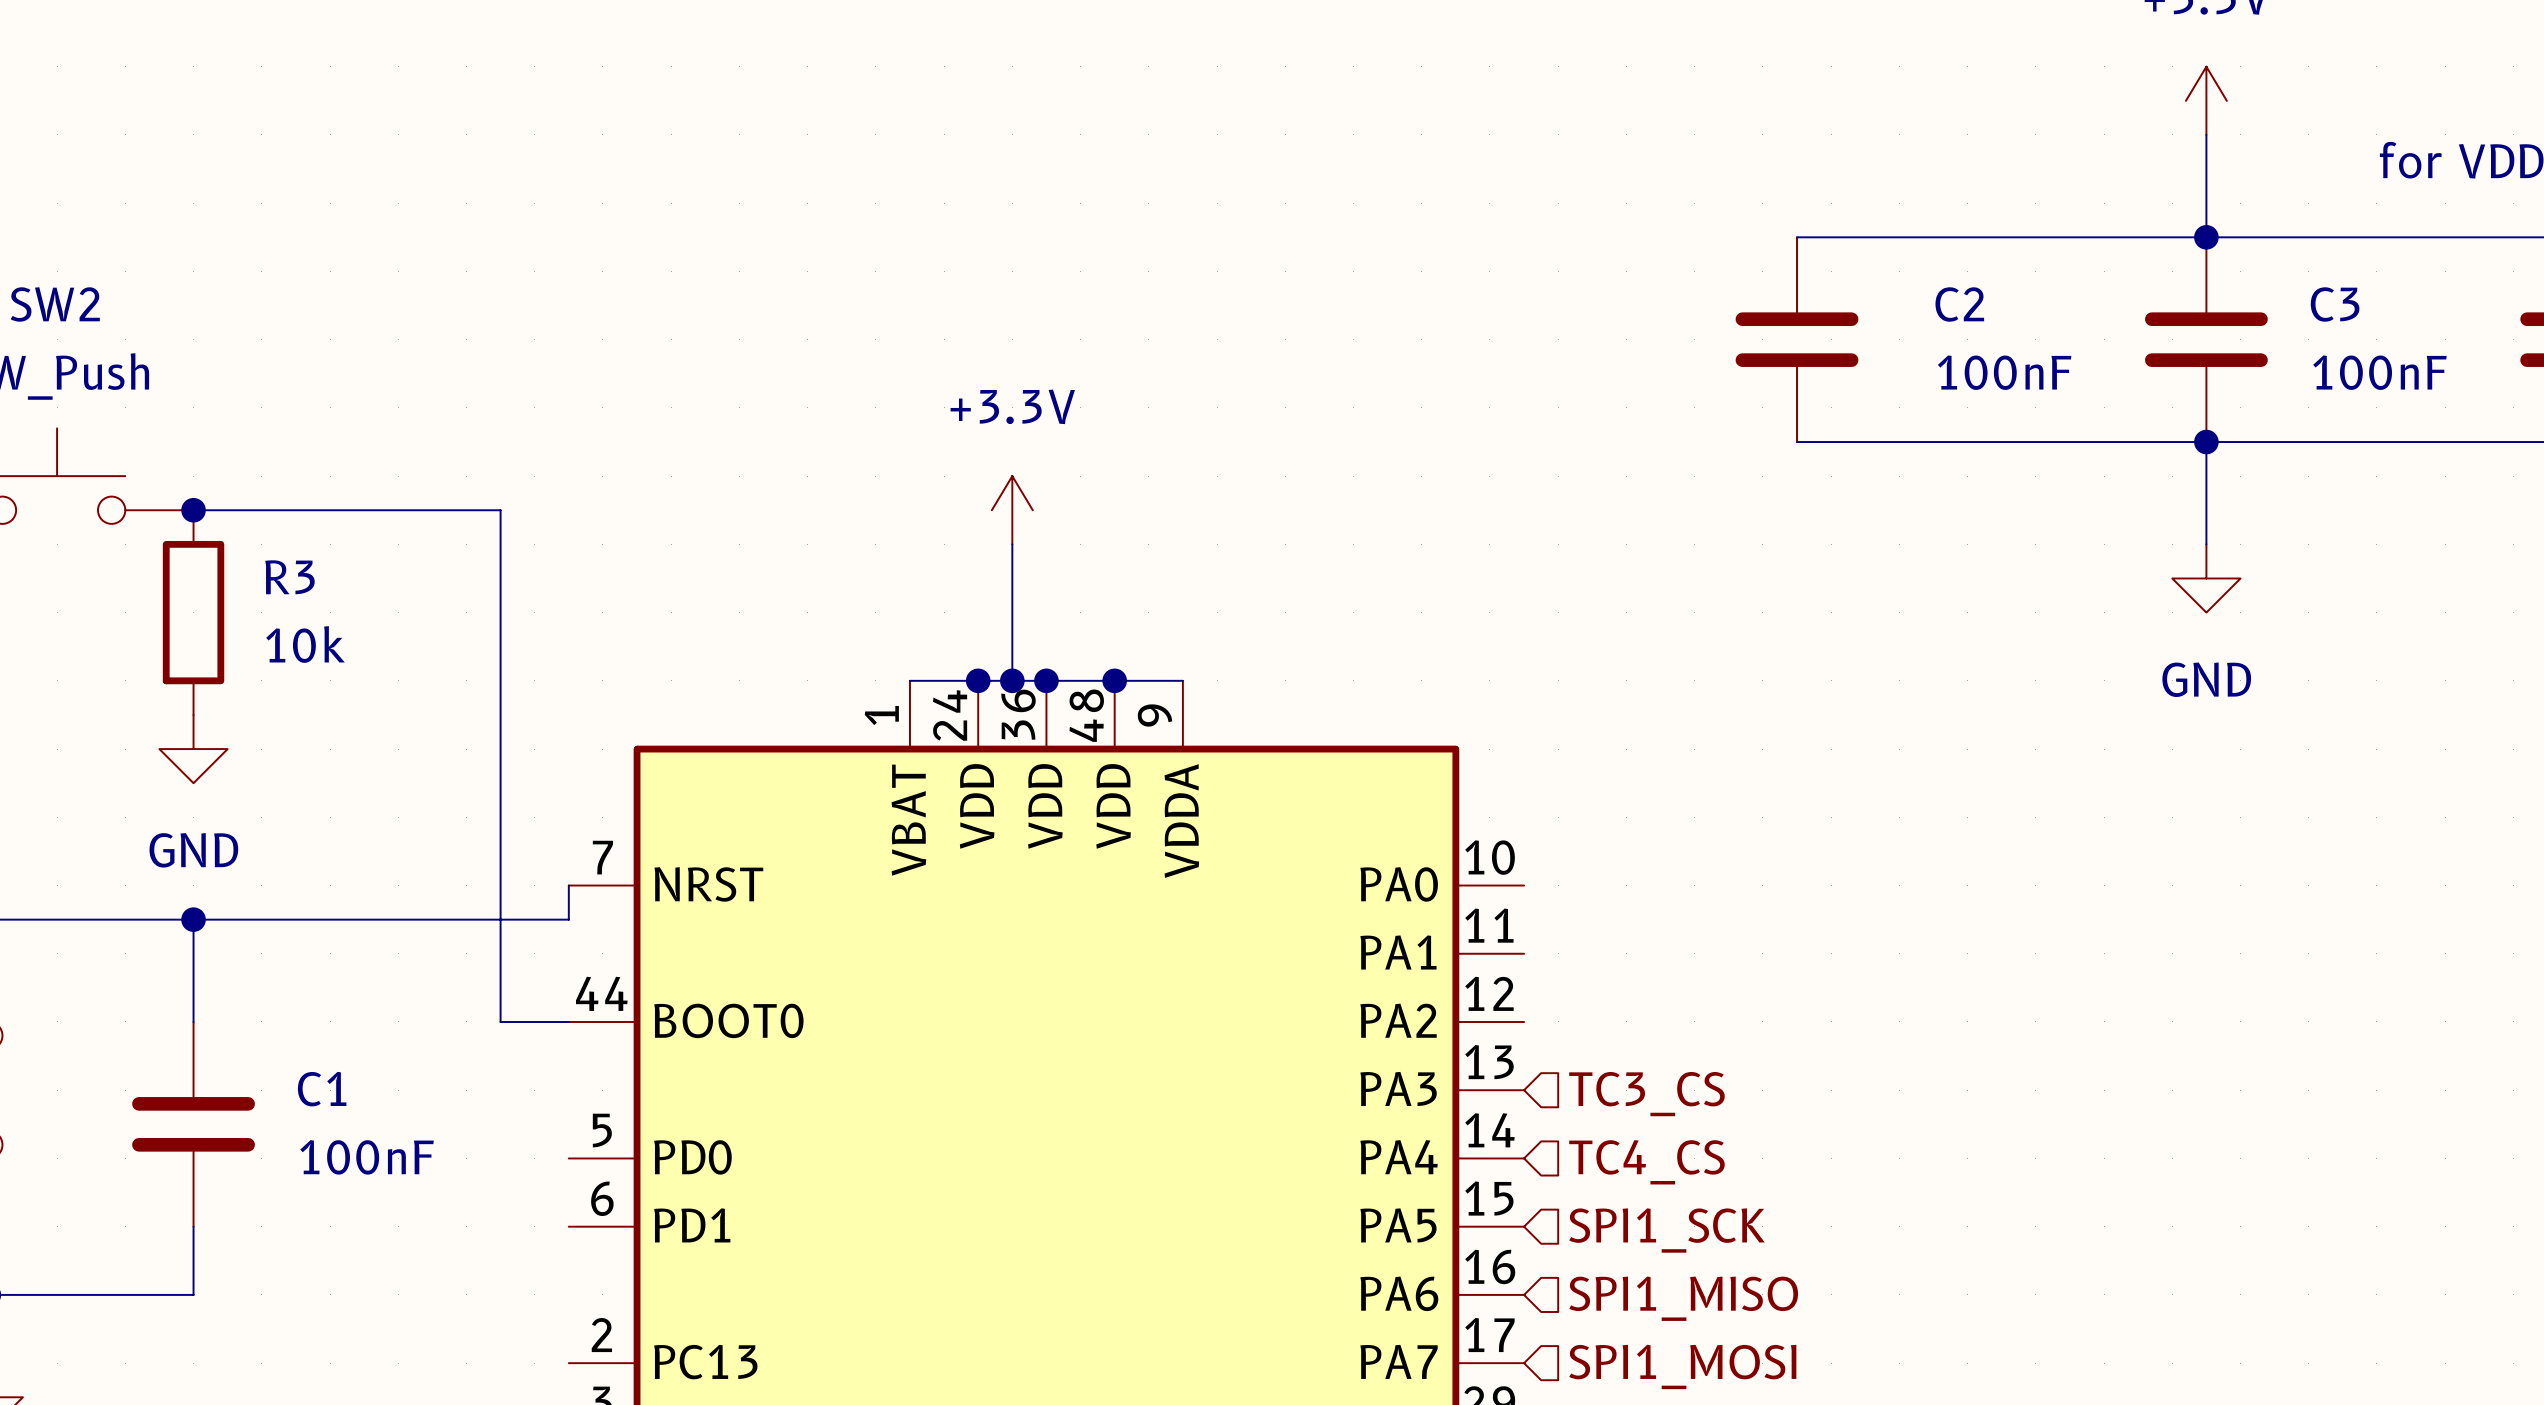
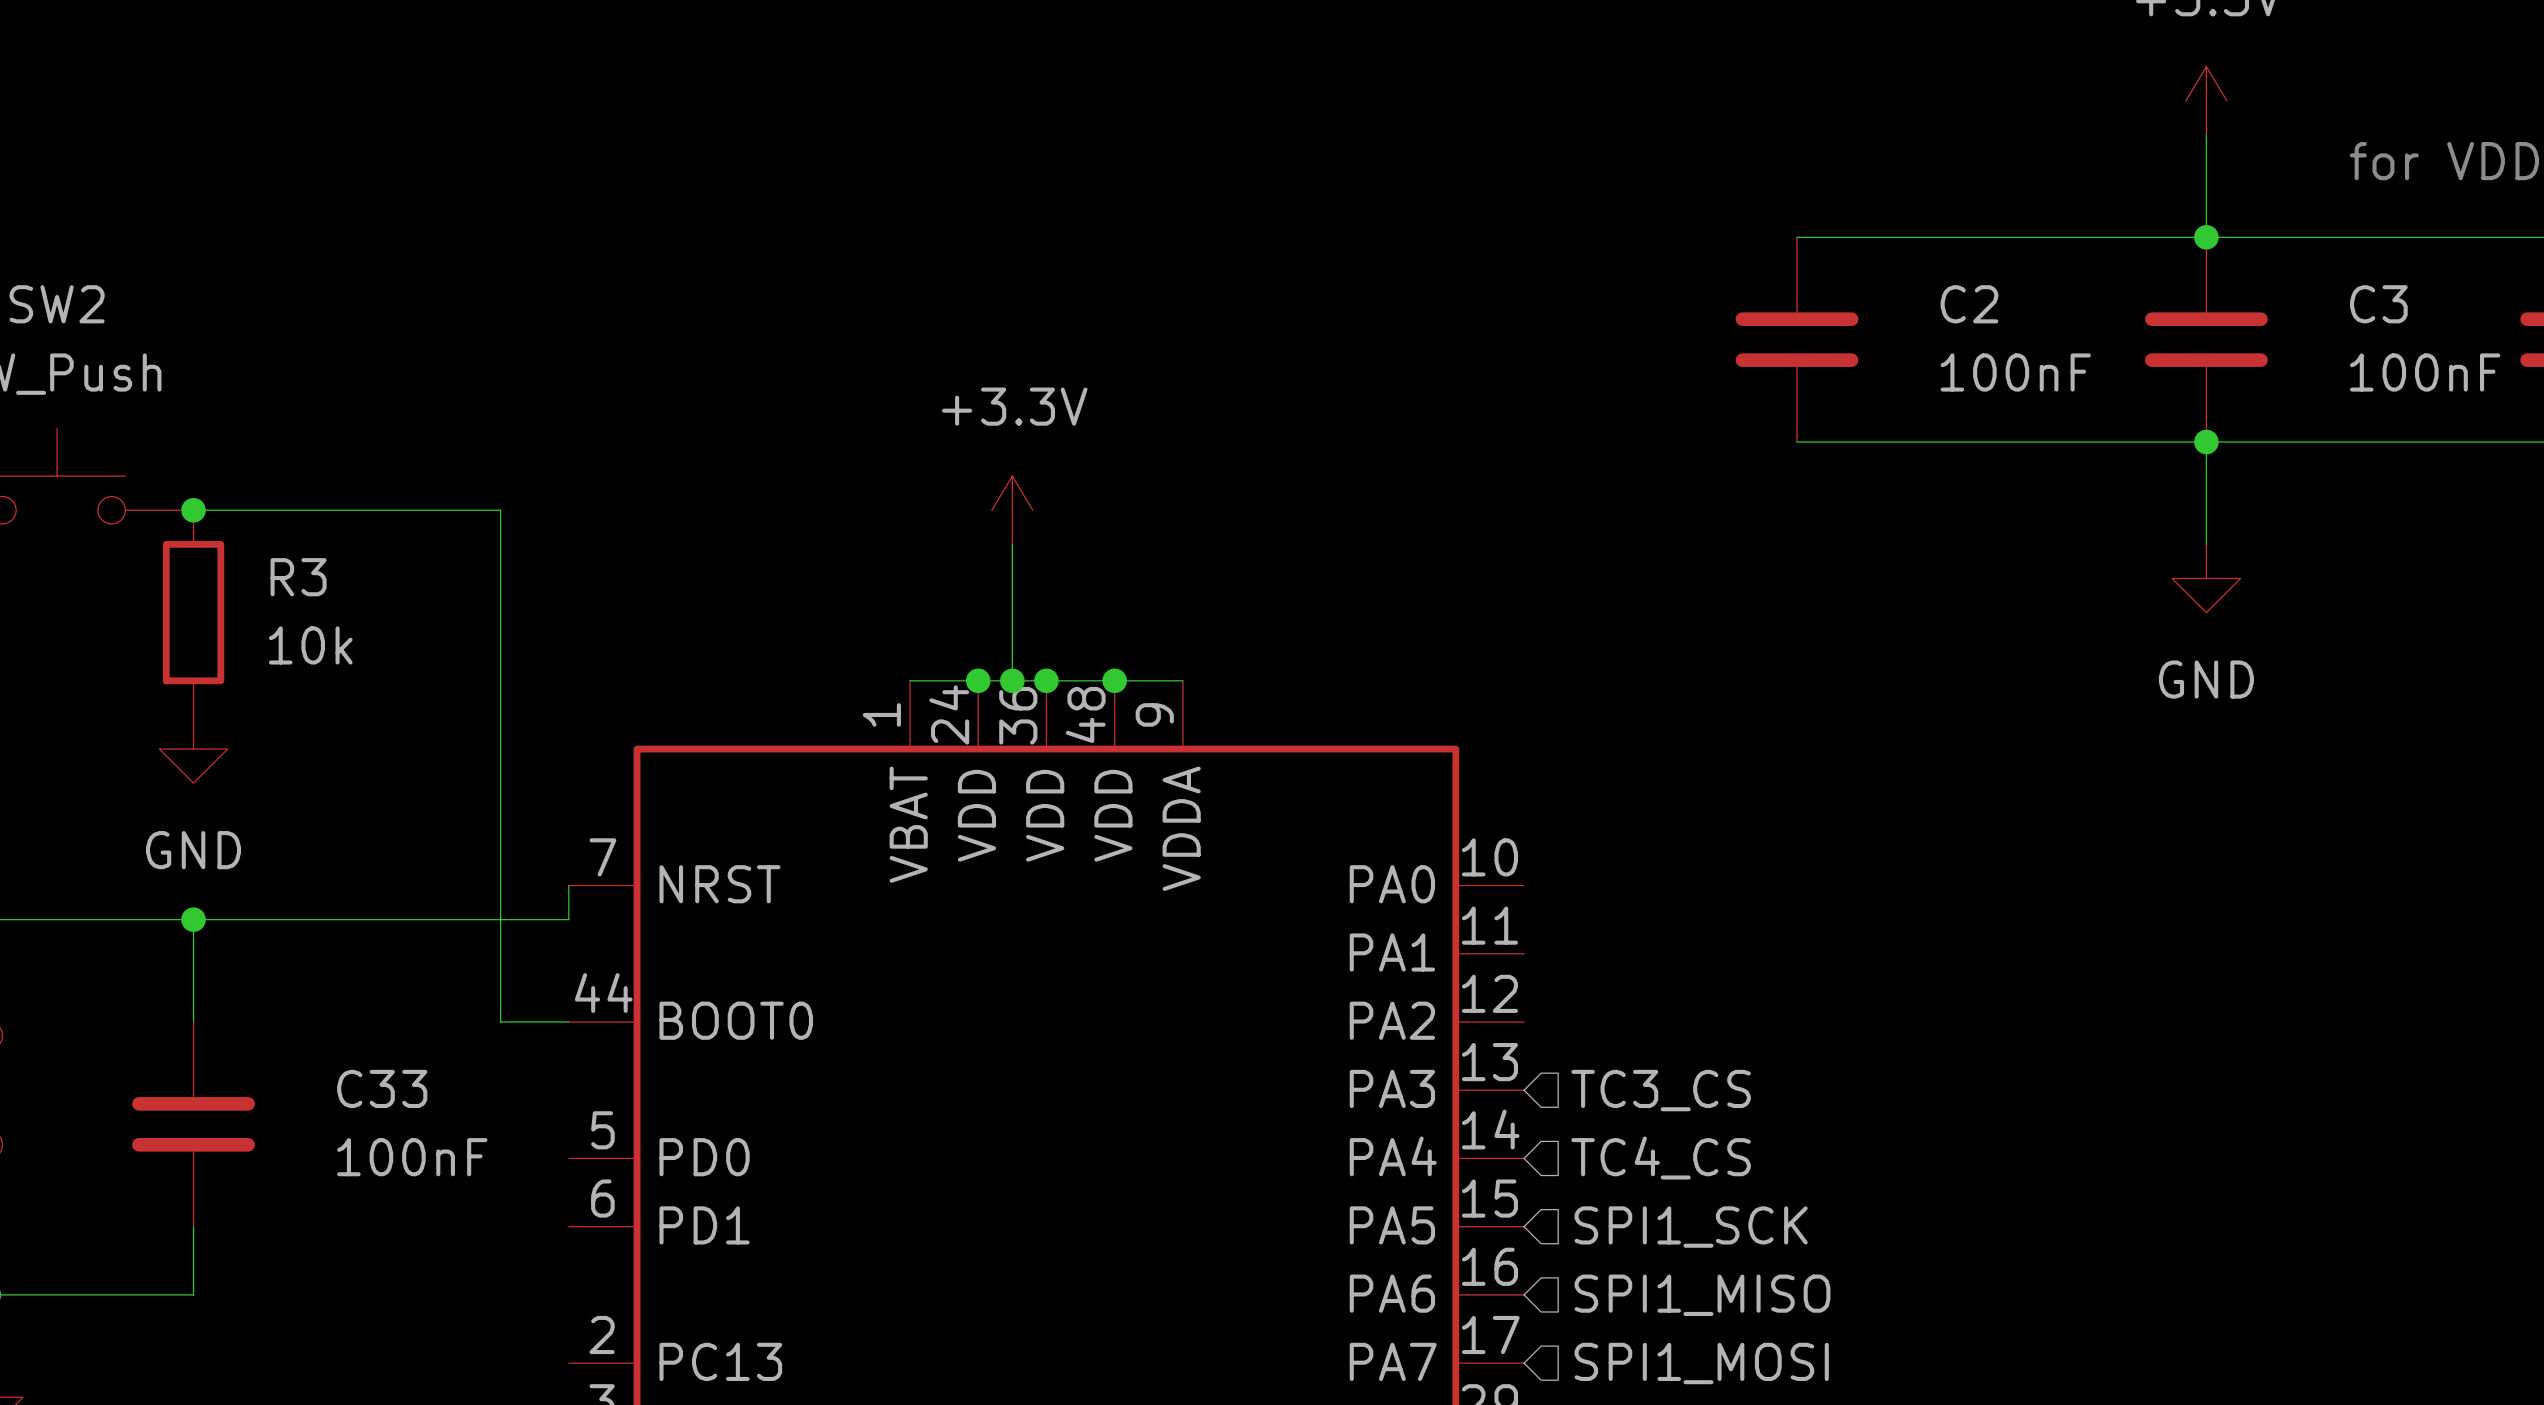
C3 name position: C3 (2335, 304) -> C3 (2378, 304)
C3 value position: 100nF (2379, 372) -> 100nF (2425, 372)
C1 name: C1 (322, 1089) -> C33 (382, 1088)
C1 value position: 100nF (367, 1157) -> 100nF (412, 1157)

